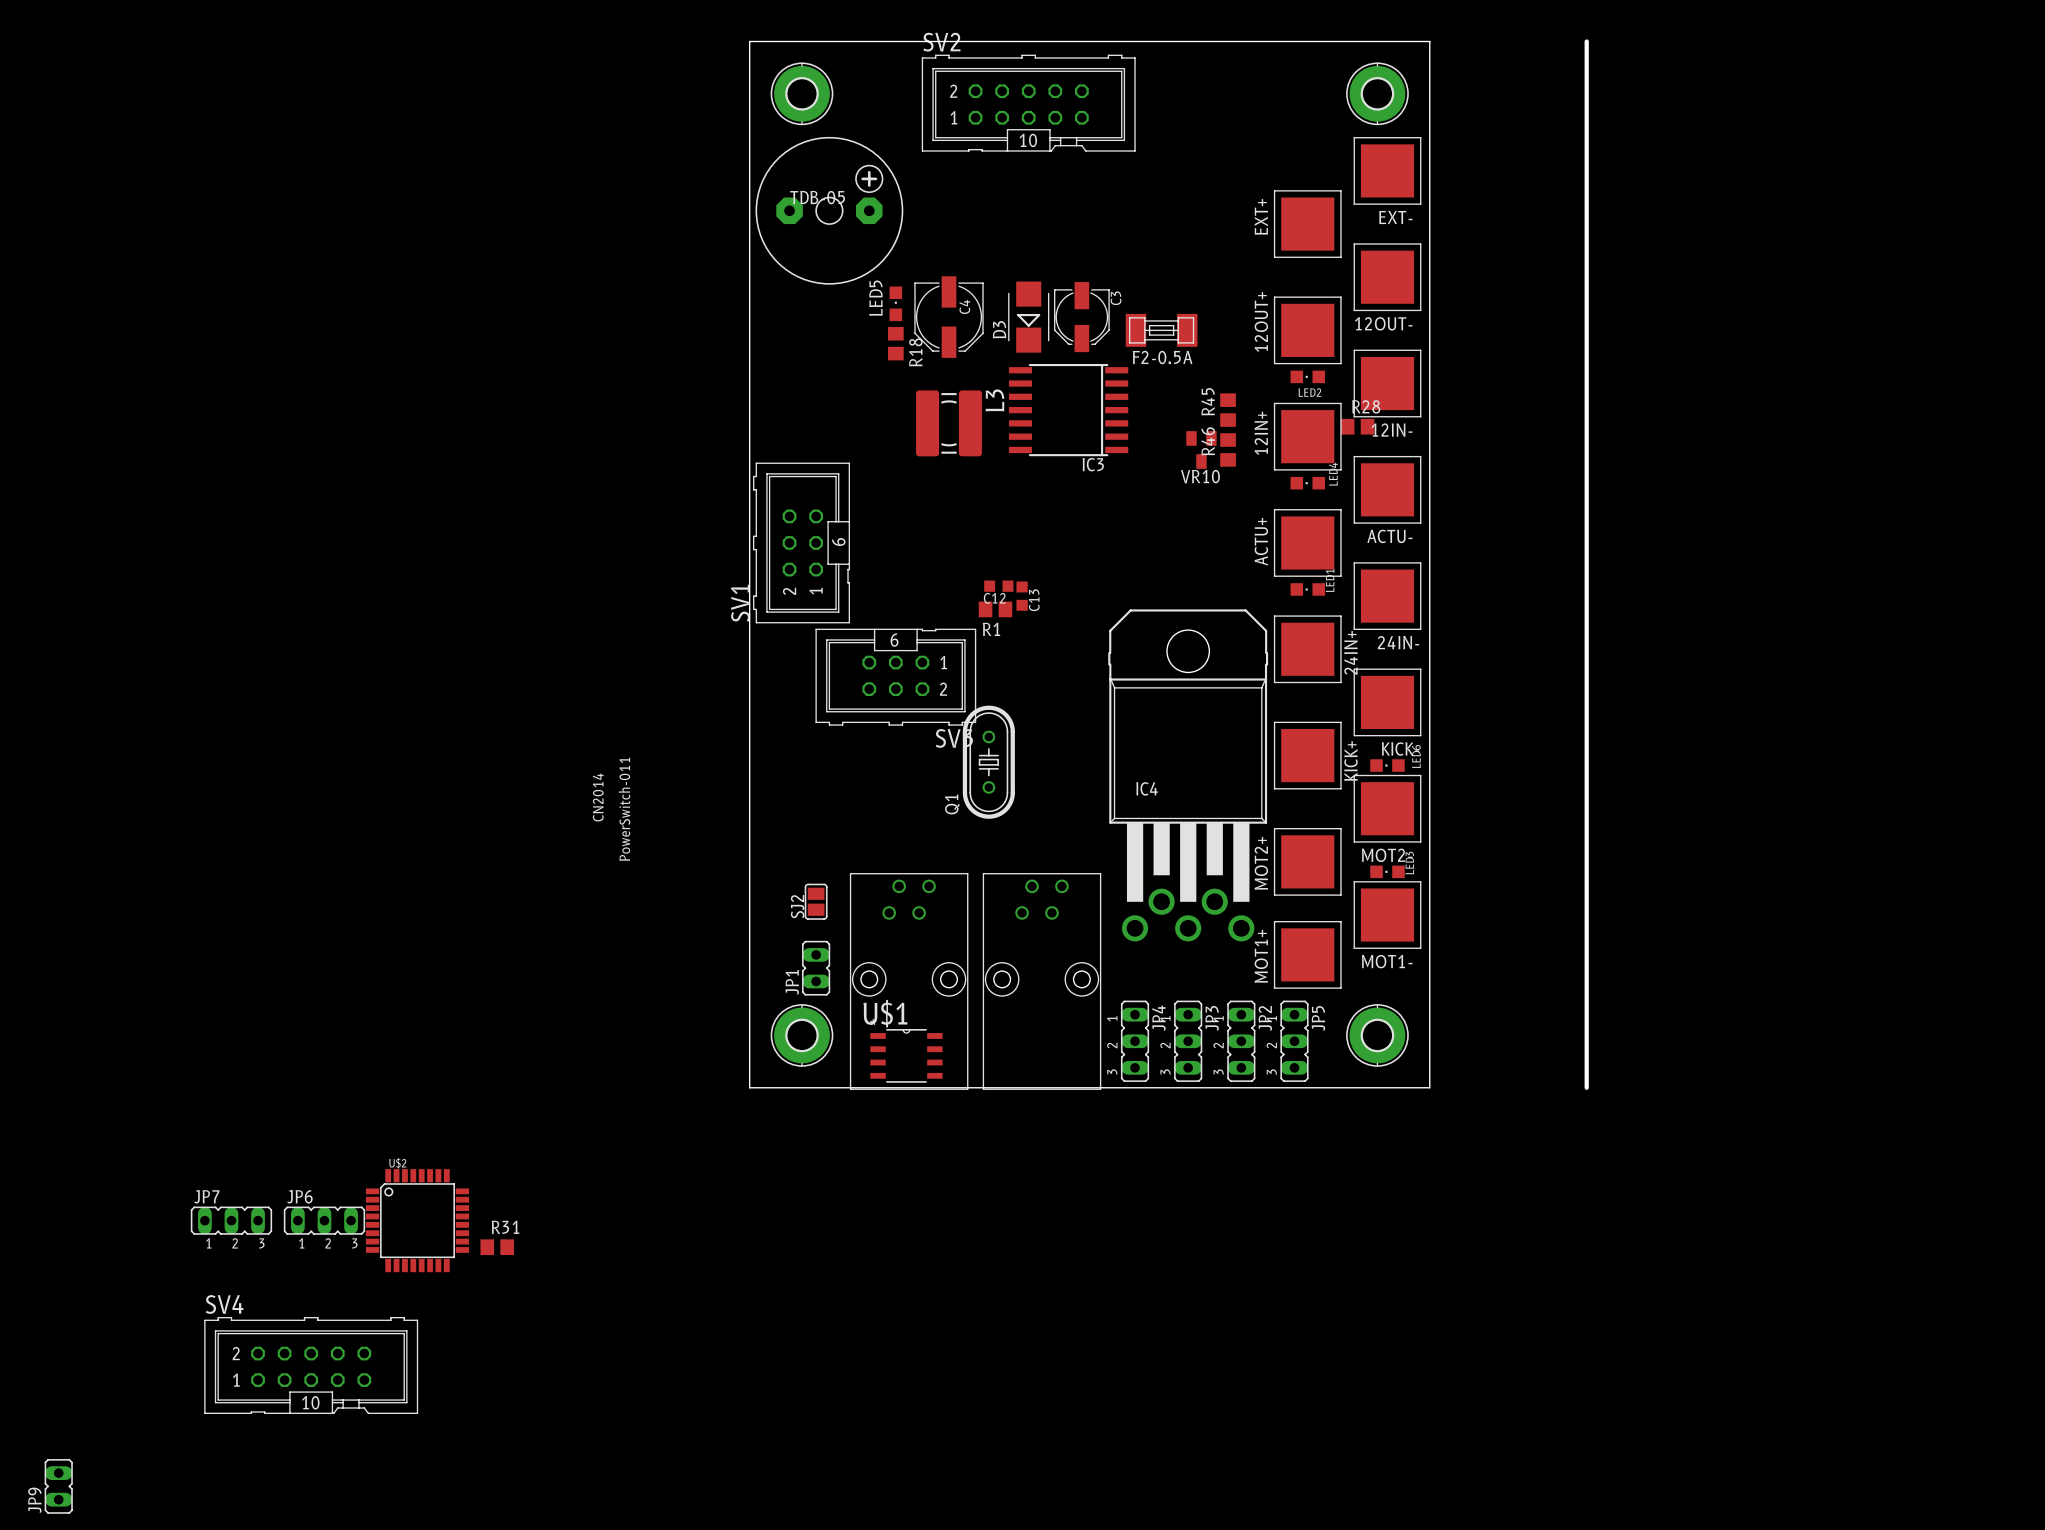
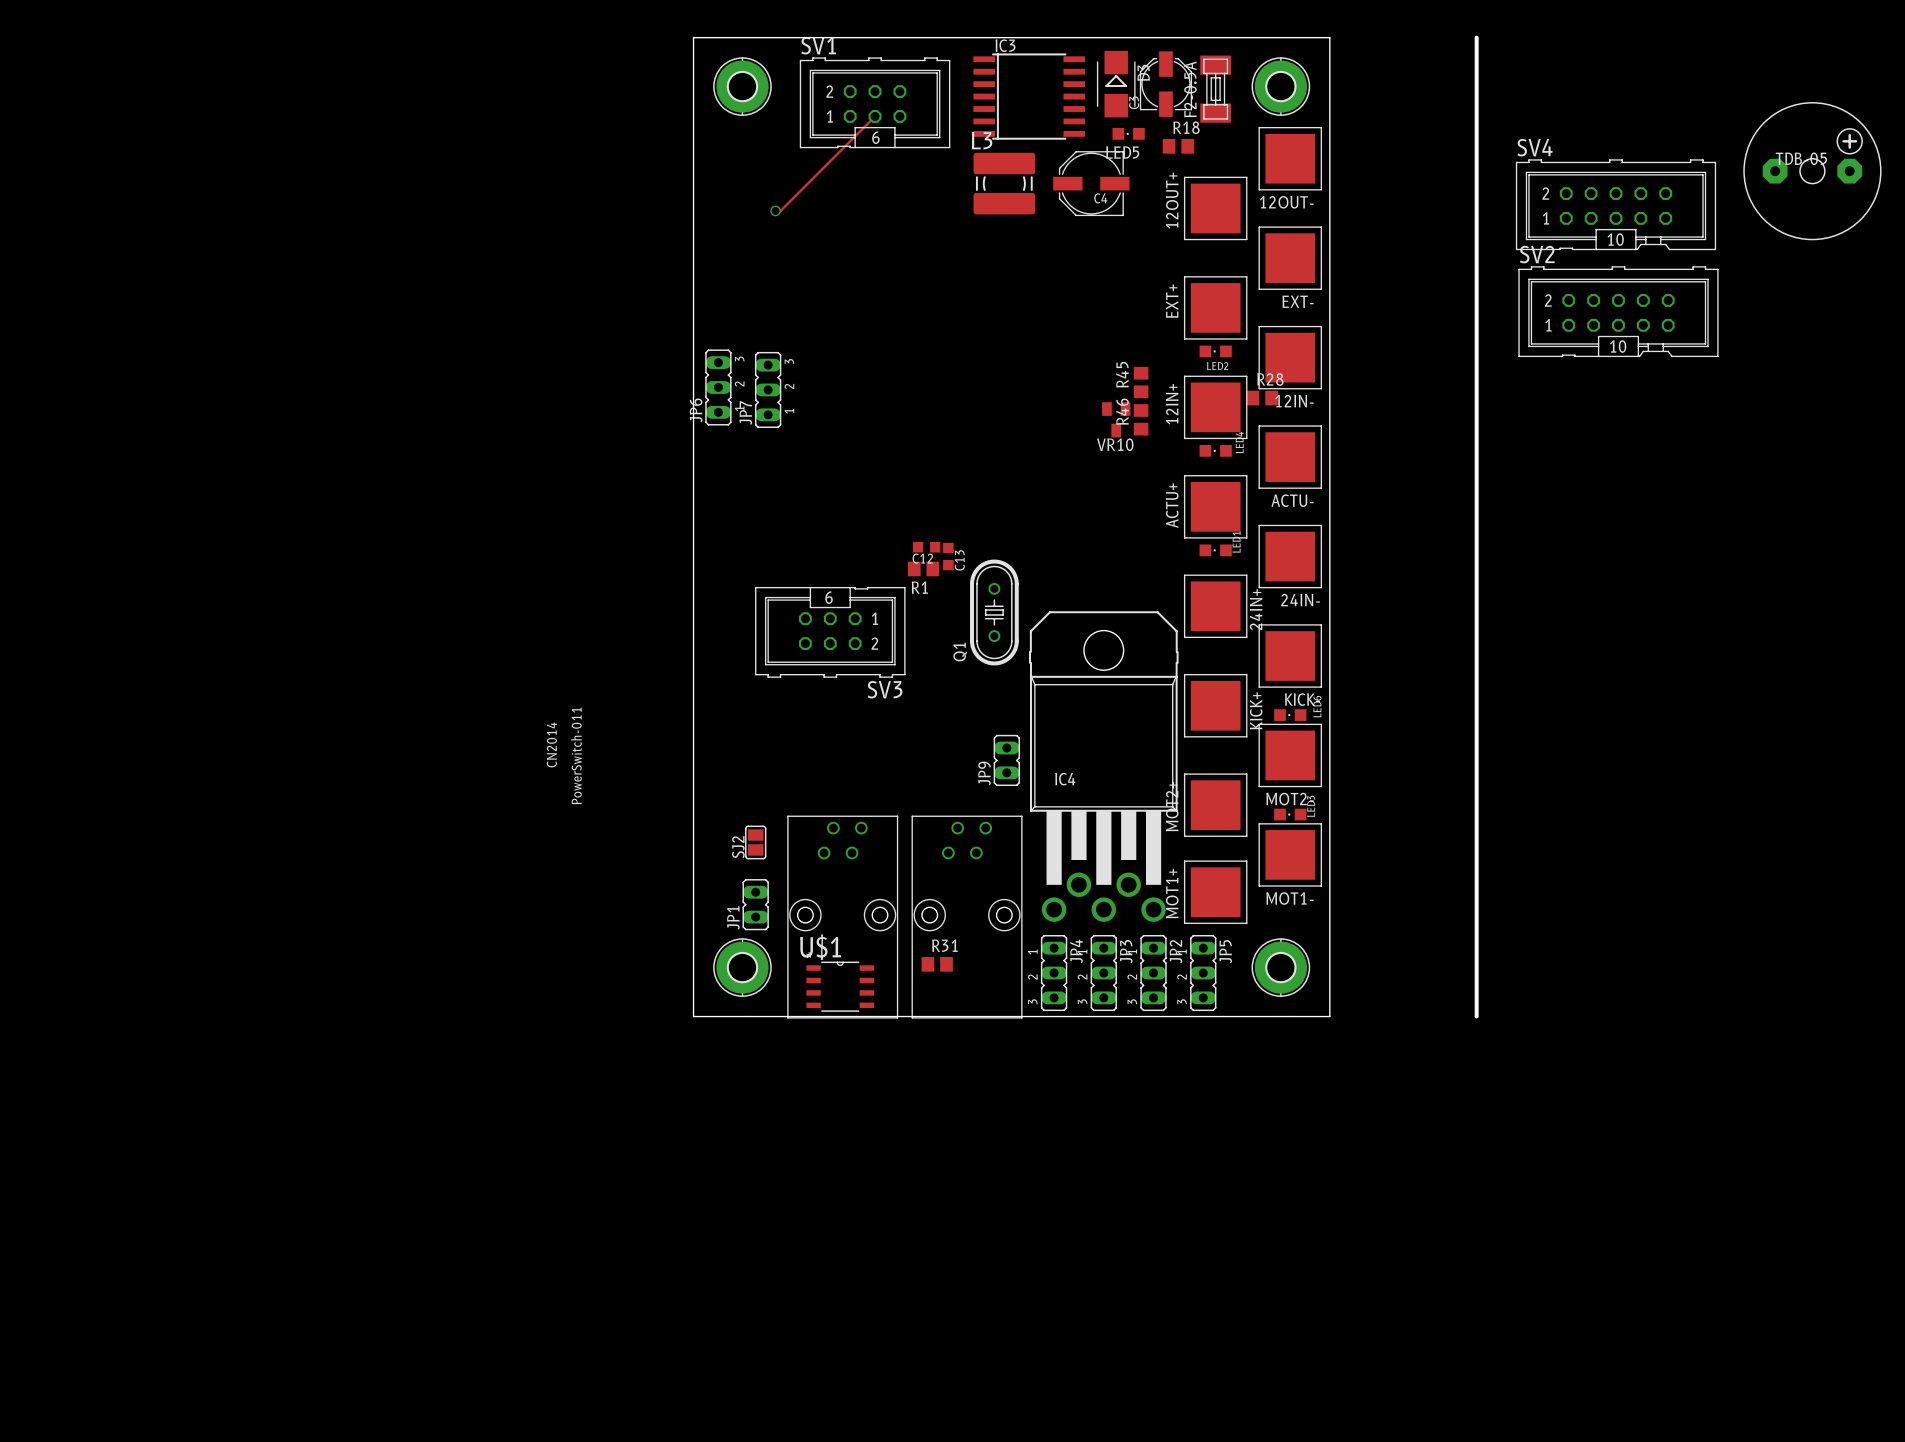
SV2 position: (1028, 103) -> (1618, 311)
track: none -> (875, 116) (780, 210) (775, 210)
TDB-05 position: (829, 210) -> (1812, 171)
EXT+ name: EXT+ (1261, 216) -> 12OUT+ (1172, 200)
EXT- name: EXT- (1395, 217) -> 12OUT- (1286, 202)
via: none -> (775, 210)
LED5 rotation: 0° (895, 303) -> 90° counterclockwise (1128, 133)
LED5 position: (895, 303) -> (1128, 133)
C4 rotation: 0° (948, 317) -> 90° clockwise (1091, 183)
C4 position: (948, 317) -> (1091, 183)
D3 rotation: 0° (1028, 317) -> 180° (1116, 84)
D3 position: (1028, 317) -> (1116, 84)
C3 rotation: 0° (1081, 317) -> 180° (1165, 84)
C3 position: (1081, 317) -> (1165, 84)
12OUT+ name: 12OUT+ (1261, 321) -> EXT+ (1172, 301)
12OUT- name: 12OUT- (1383, 323) -> EXT- (1298, 301)
F2-0.5A rotation: 0° (1161, 330) -> 90° clockwise (1215, 89)
F2-0.5A position: (1161, 330) -> (1215, 89)
R18 rotation: 0° (895, 343) -> 90° clockwise (1178, 146)
R18 position: (895, 343) -> (1178, 146)
R18 name position: R18 (915, 352) -> R18 (1186, 127)
L3 name position: L3 (994, 400) -> L3 (982, 140)
IC3 rotation: 0° (1068, 410) -> 180° (1029, 96)
IC3 position: (1068, 410) -> (1029, 96)
L3 rotation: 0° (948, 423) -> 90° clockwise (1004, 183)
L3 position: (948, 423) -> (1004, 183)
SV1 rotation: 0° (801, 542) -> 90° clockwise (875, 102)
SV1 position: (801, 542) -> (875, 102)
Q1 position: (988, 762) -> (994, 612)
IC4 position: (1188, 775) -> (1103, 766)
JP7 rotation: 0° (231, 1220) -> 90° counterclockwise (768, 389)
JP7 position: (231, 1220) -> (768, 389)
JP6 rotation: 0° (324, 1220) -> 90° counterclockwise (718, 387)
JP6 position: (324, 1220) -> (718, 387)
U$2: (417, 1220) -> none
R31 position: (497, 1247) -> (937, 964)
SV4 position: (311, 1365) -> (1615, 204)
JP9 position: (58, 1486) -> (1006, 760)

